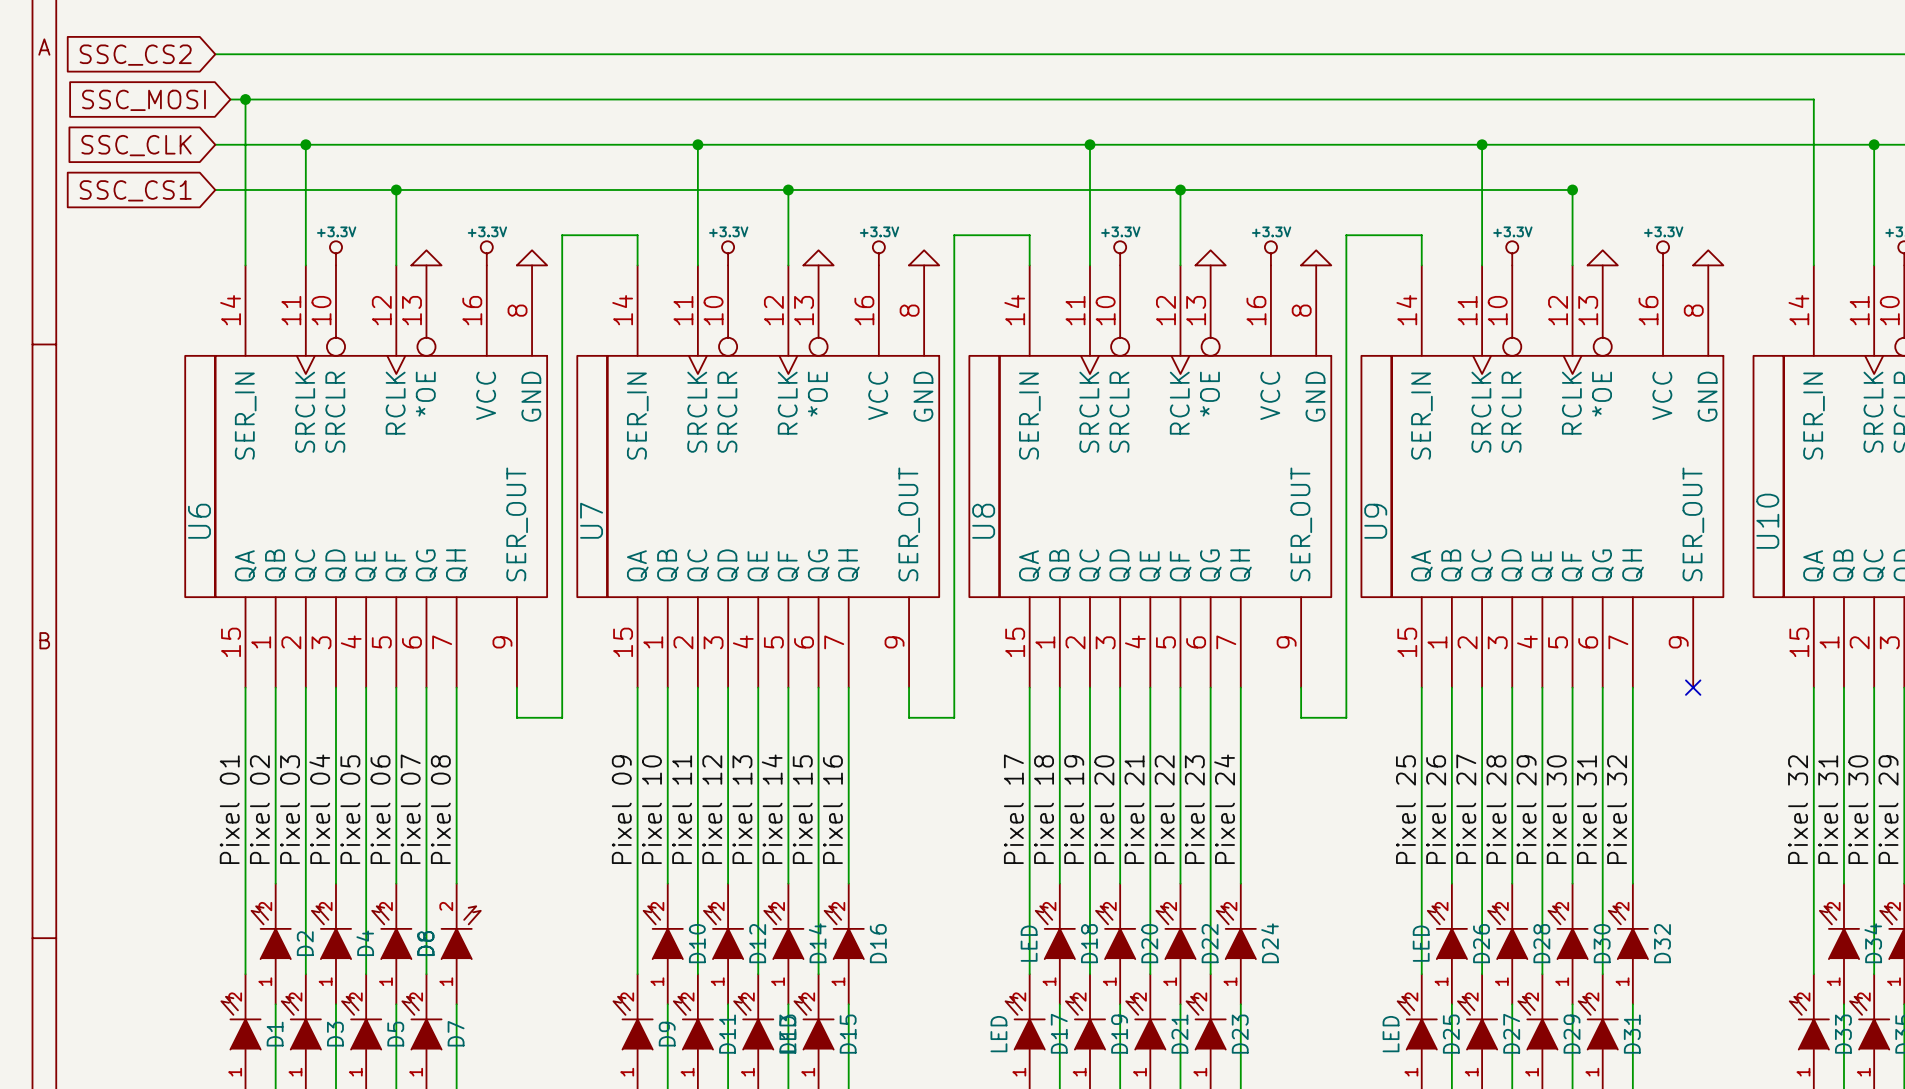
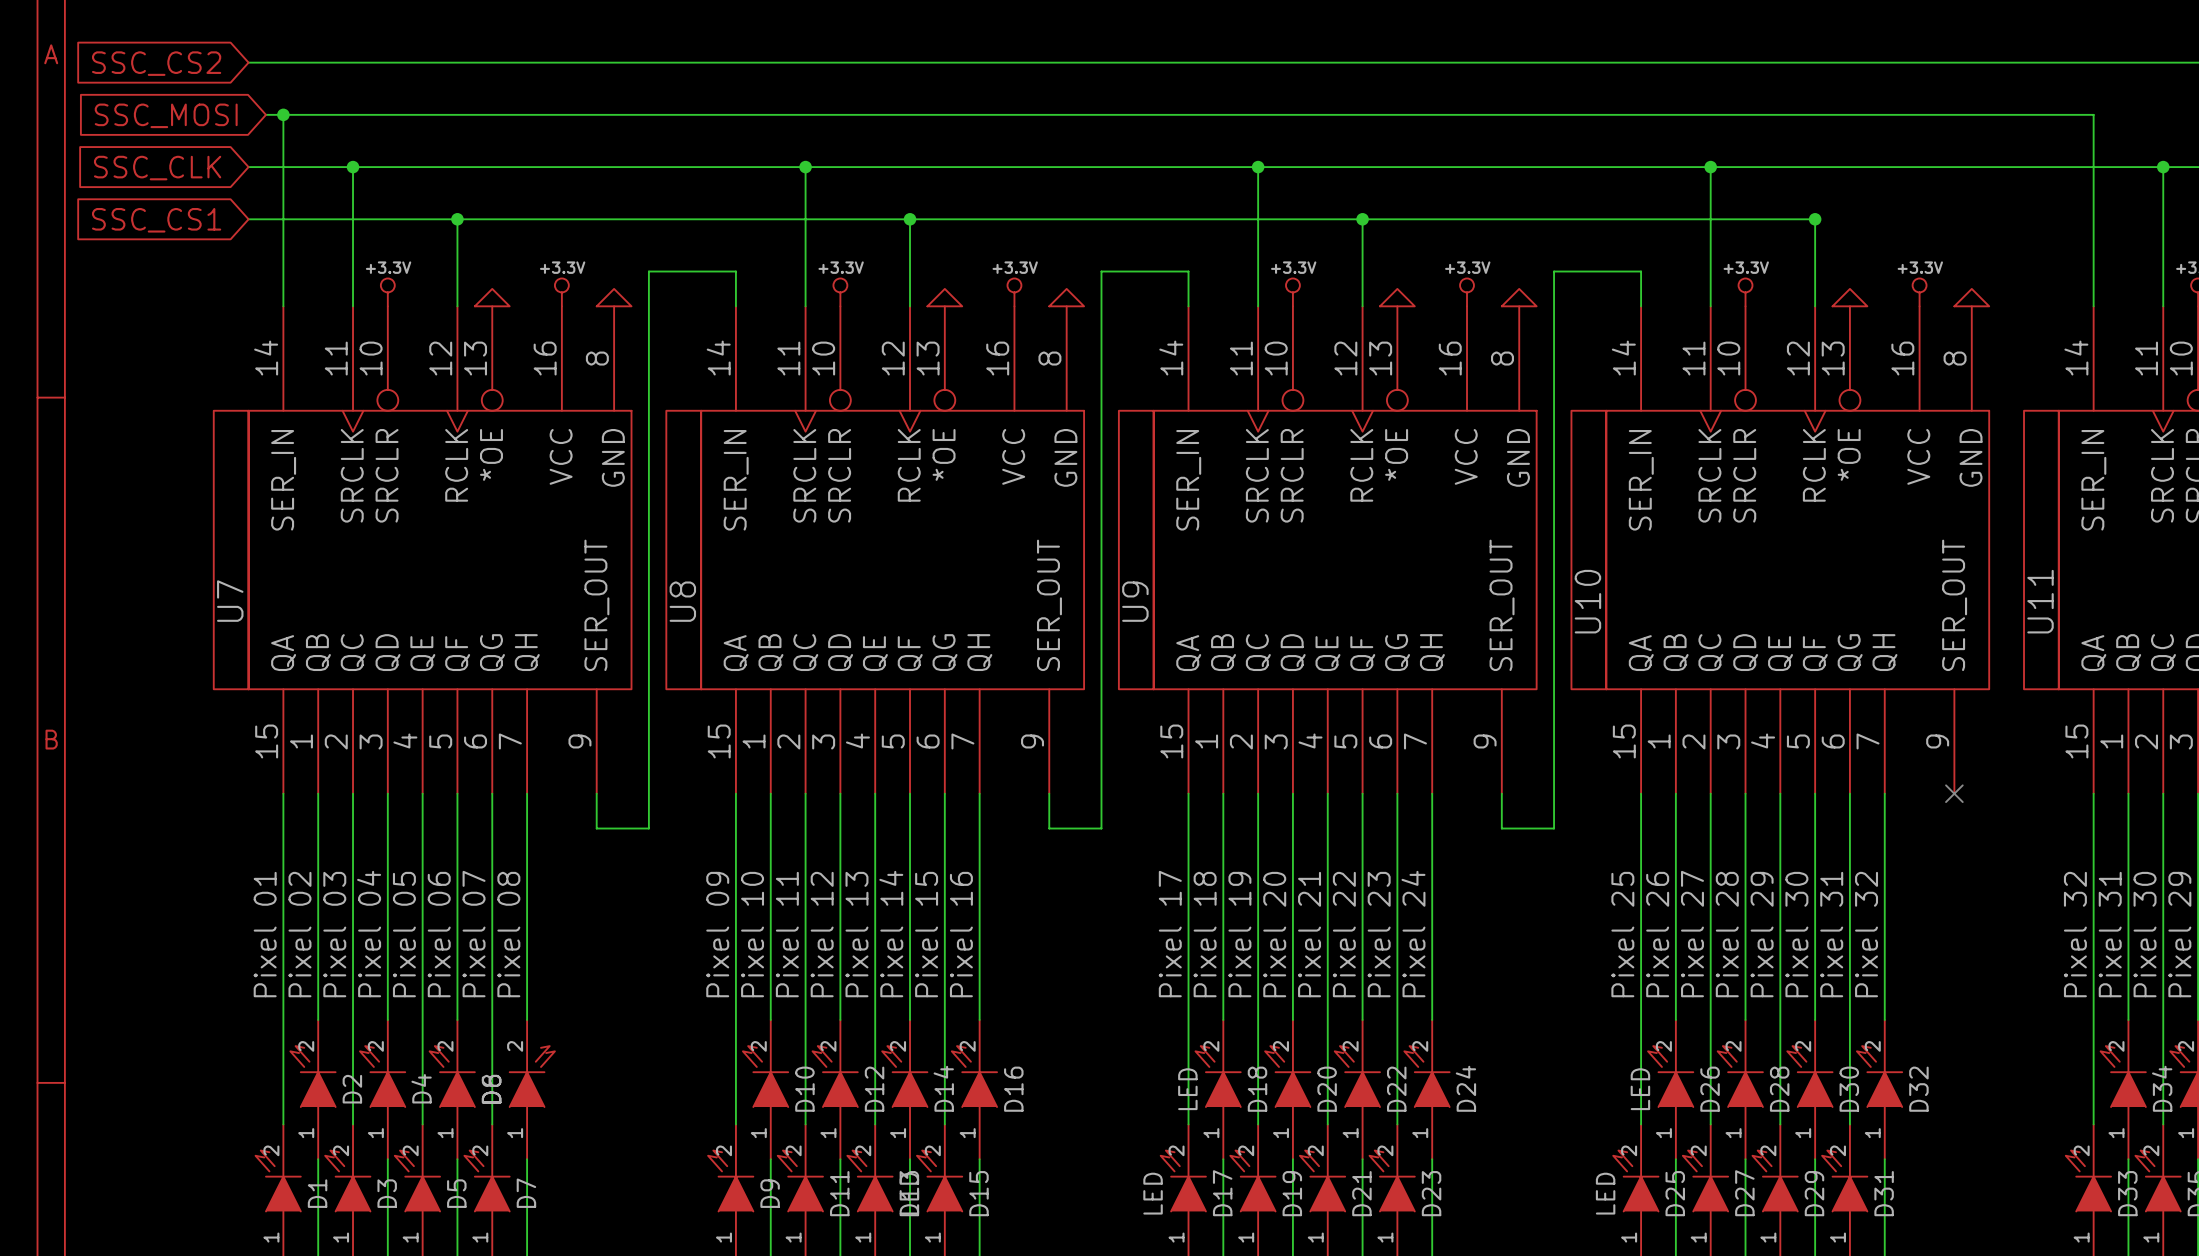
U7 name: U7 (591, 520) -> U8 (682, 601)
U6 name: U6 (199, 521) -> U7 (230, 601)
U8 name: U8 (983, 521) -> U9 (1135, 601)
U9 name: U9 (1375, 521) -> U10 (1587, 601)
U10 name: U10 (1767, 521) -> U11 (2040, 601)

